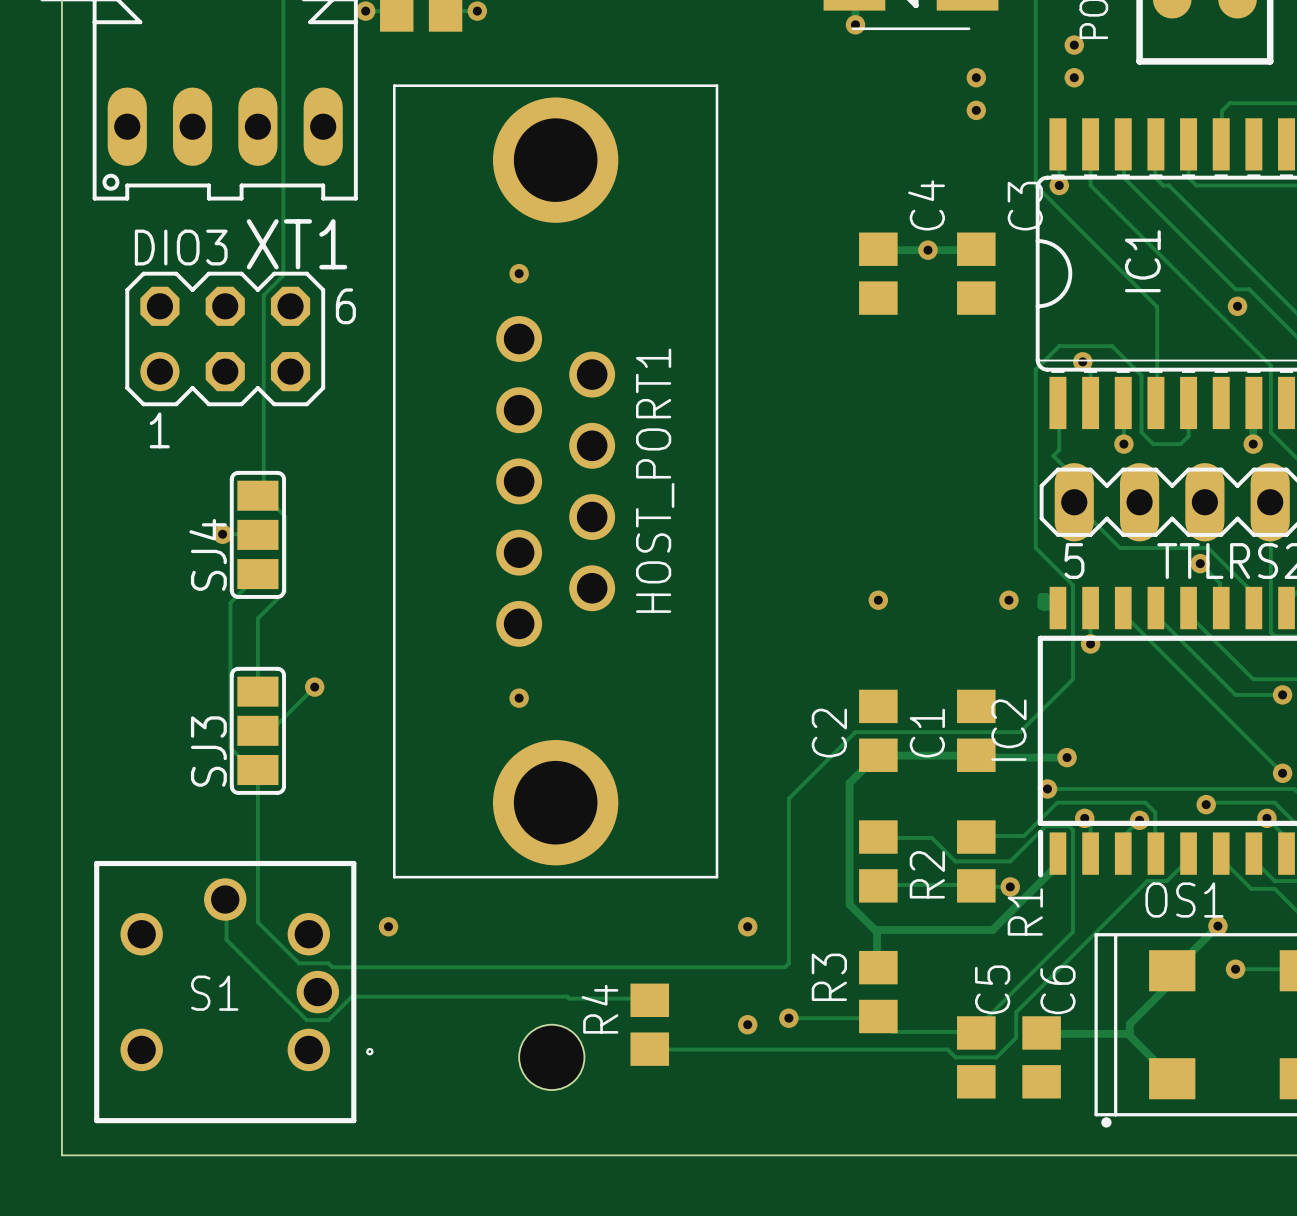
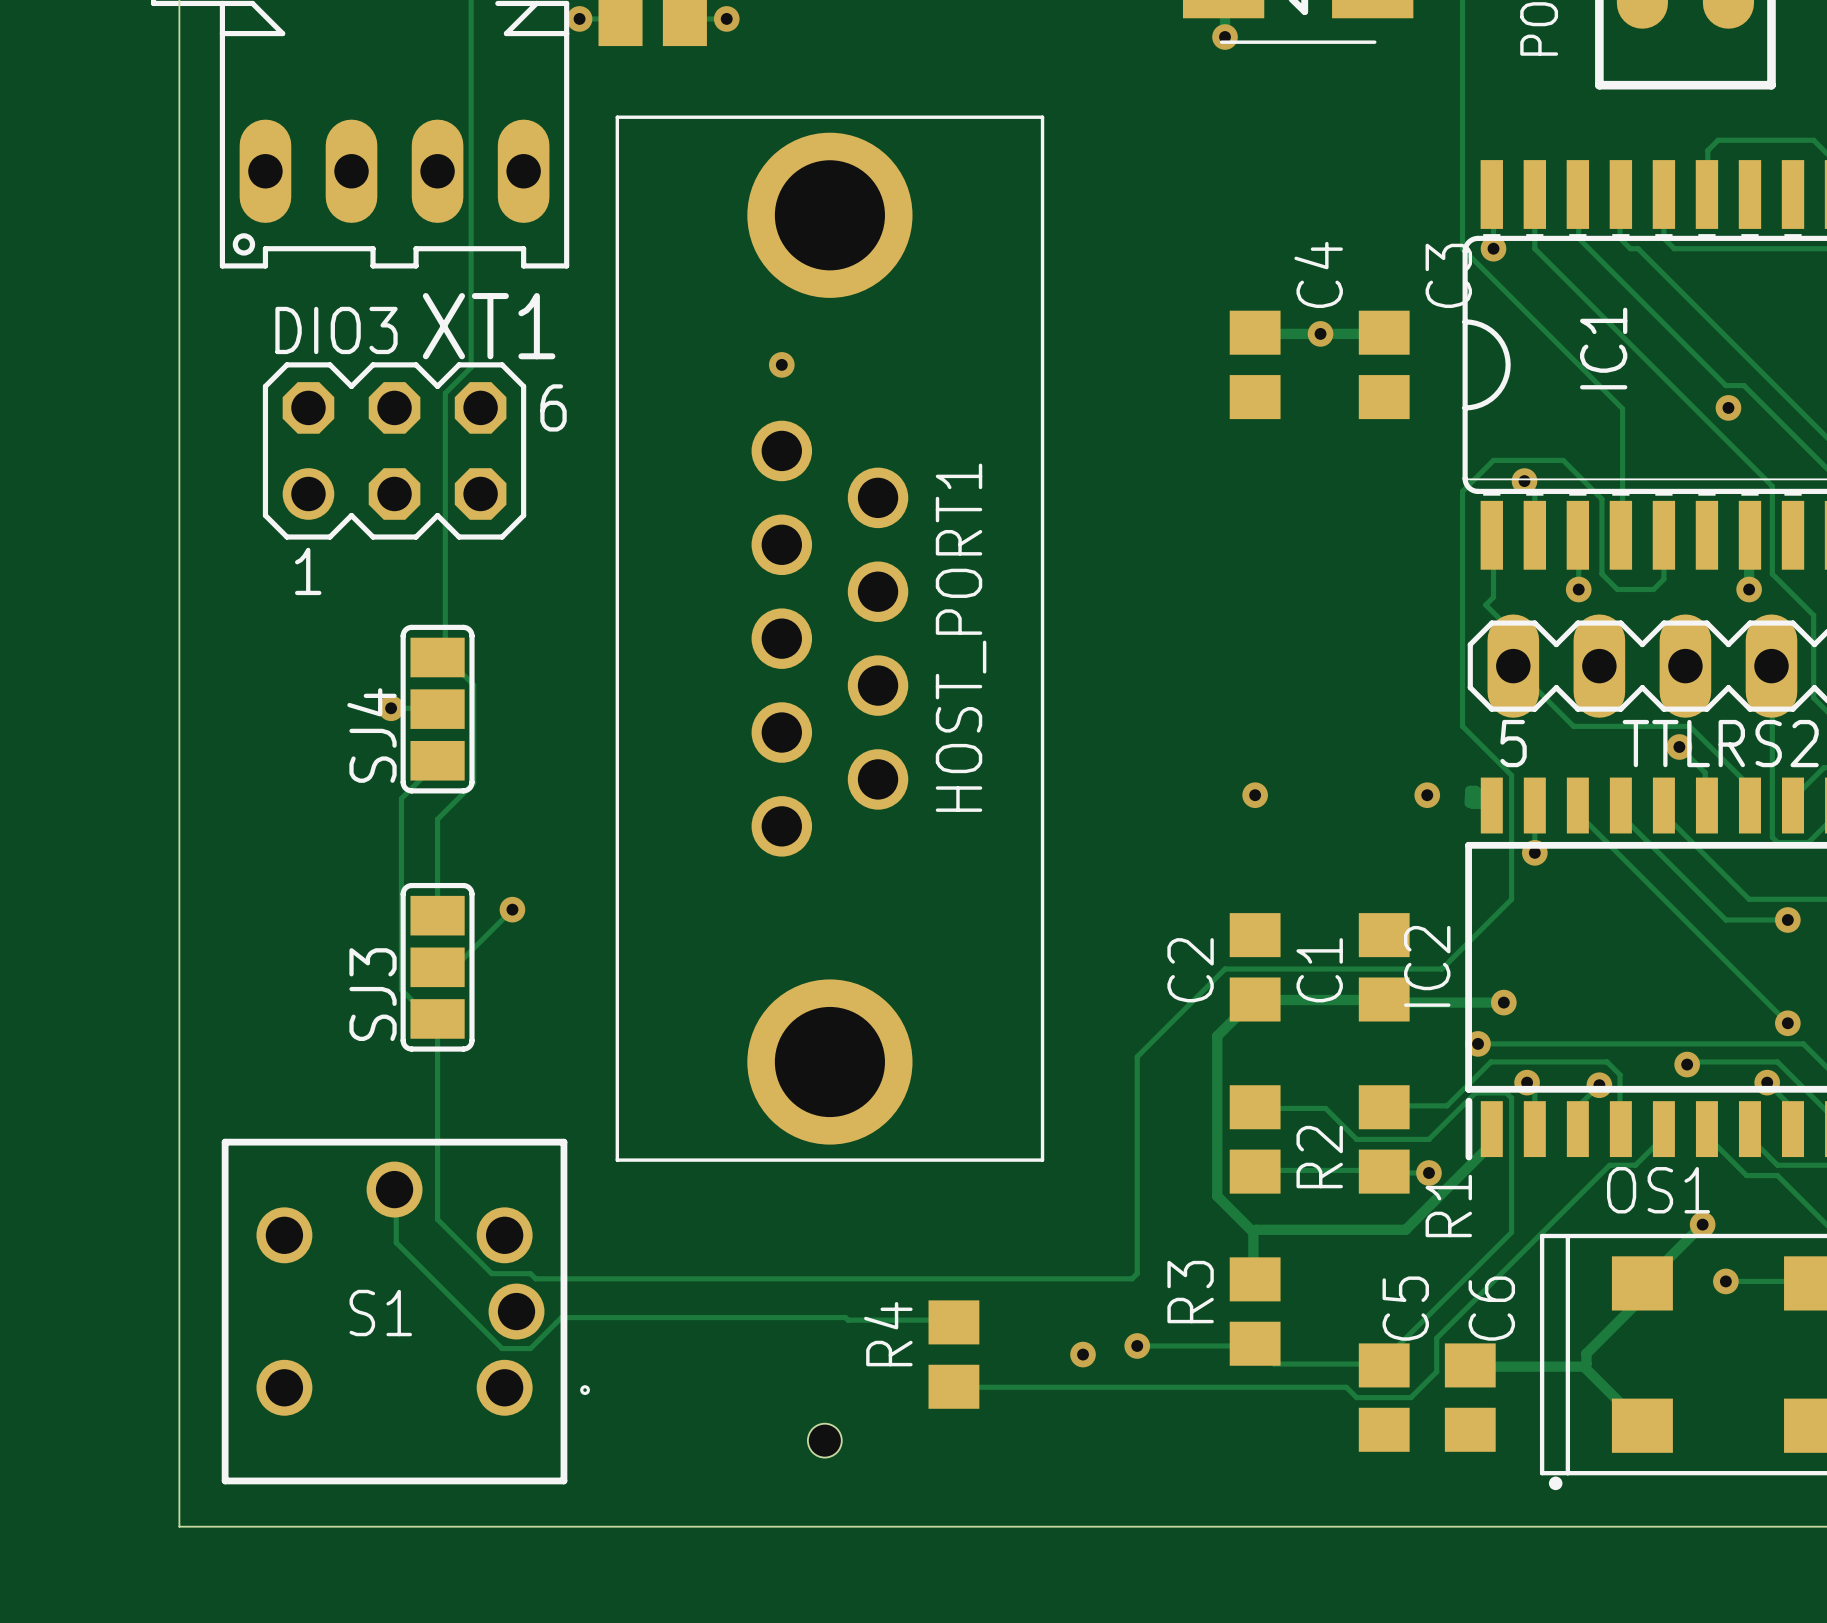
via: (1074, 45) -> none
via: (976, 77) -> none
via: (1074, 77) -> none
via: (976, 110) -> none
via: (519, 698) -> none
via: (388, 926) -> none
via: (747, 926) -> none
hole: (551, 1057) -> none
hole: none -> (824, 1440)

